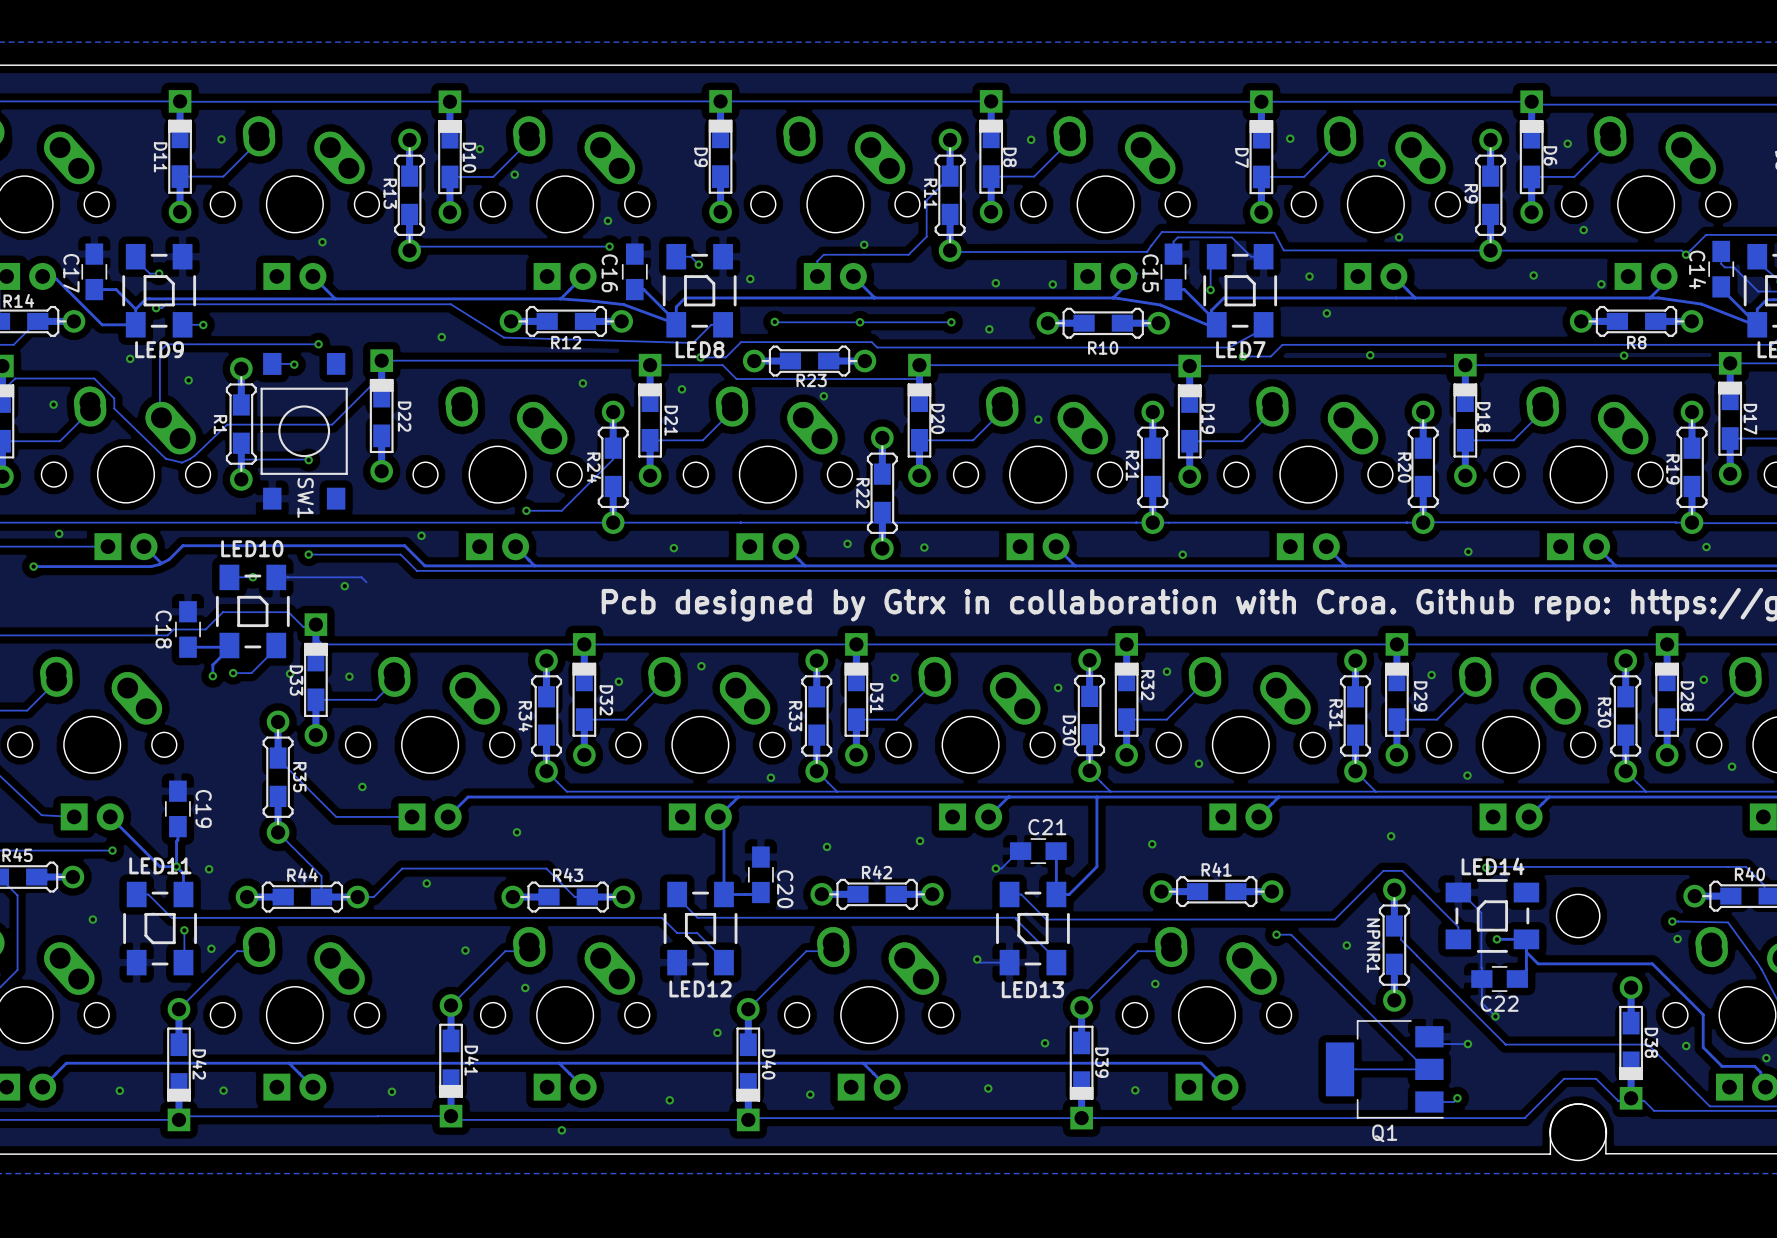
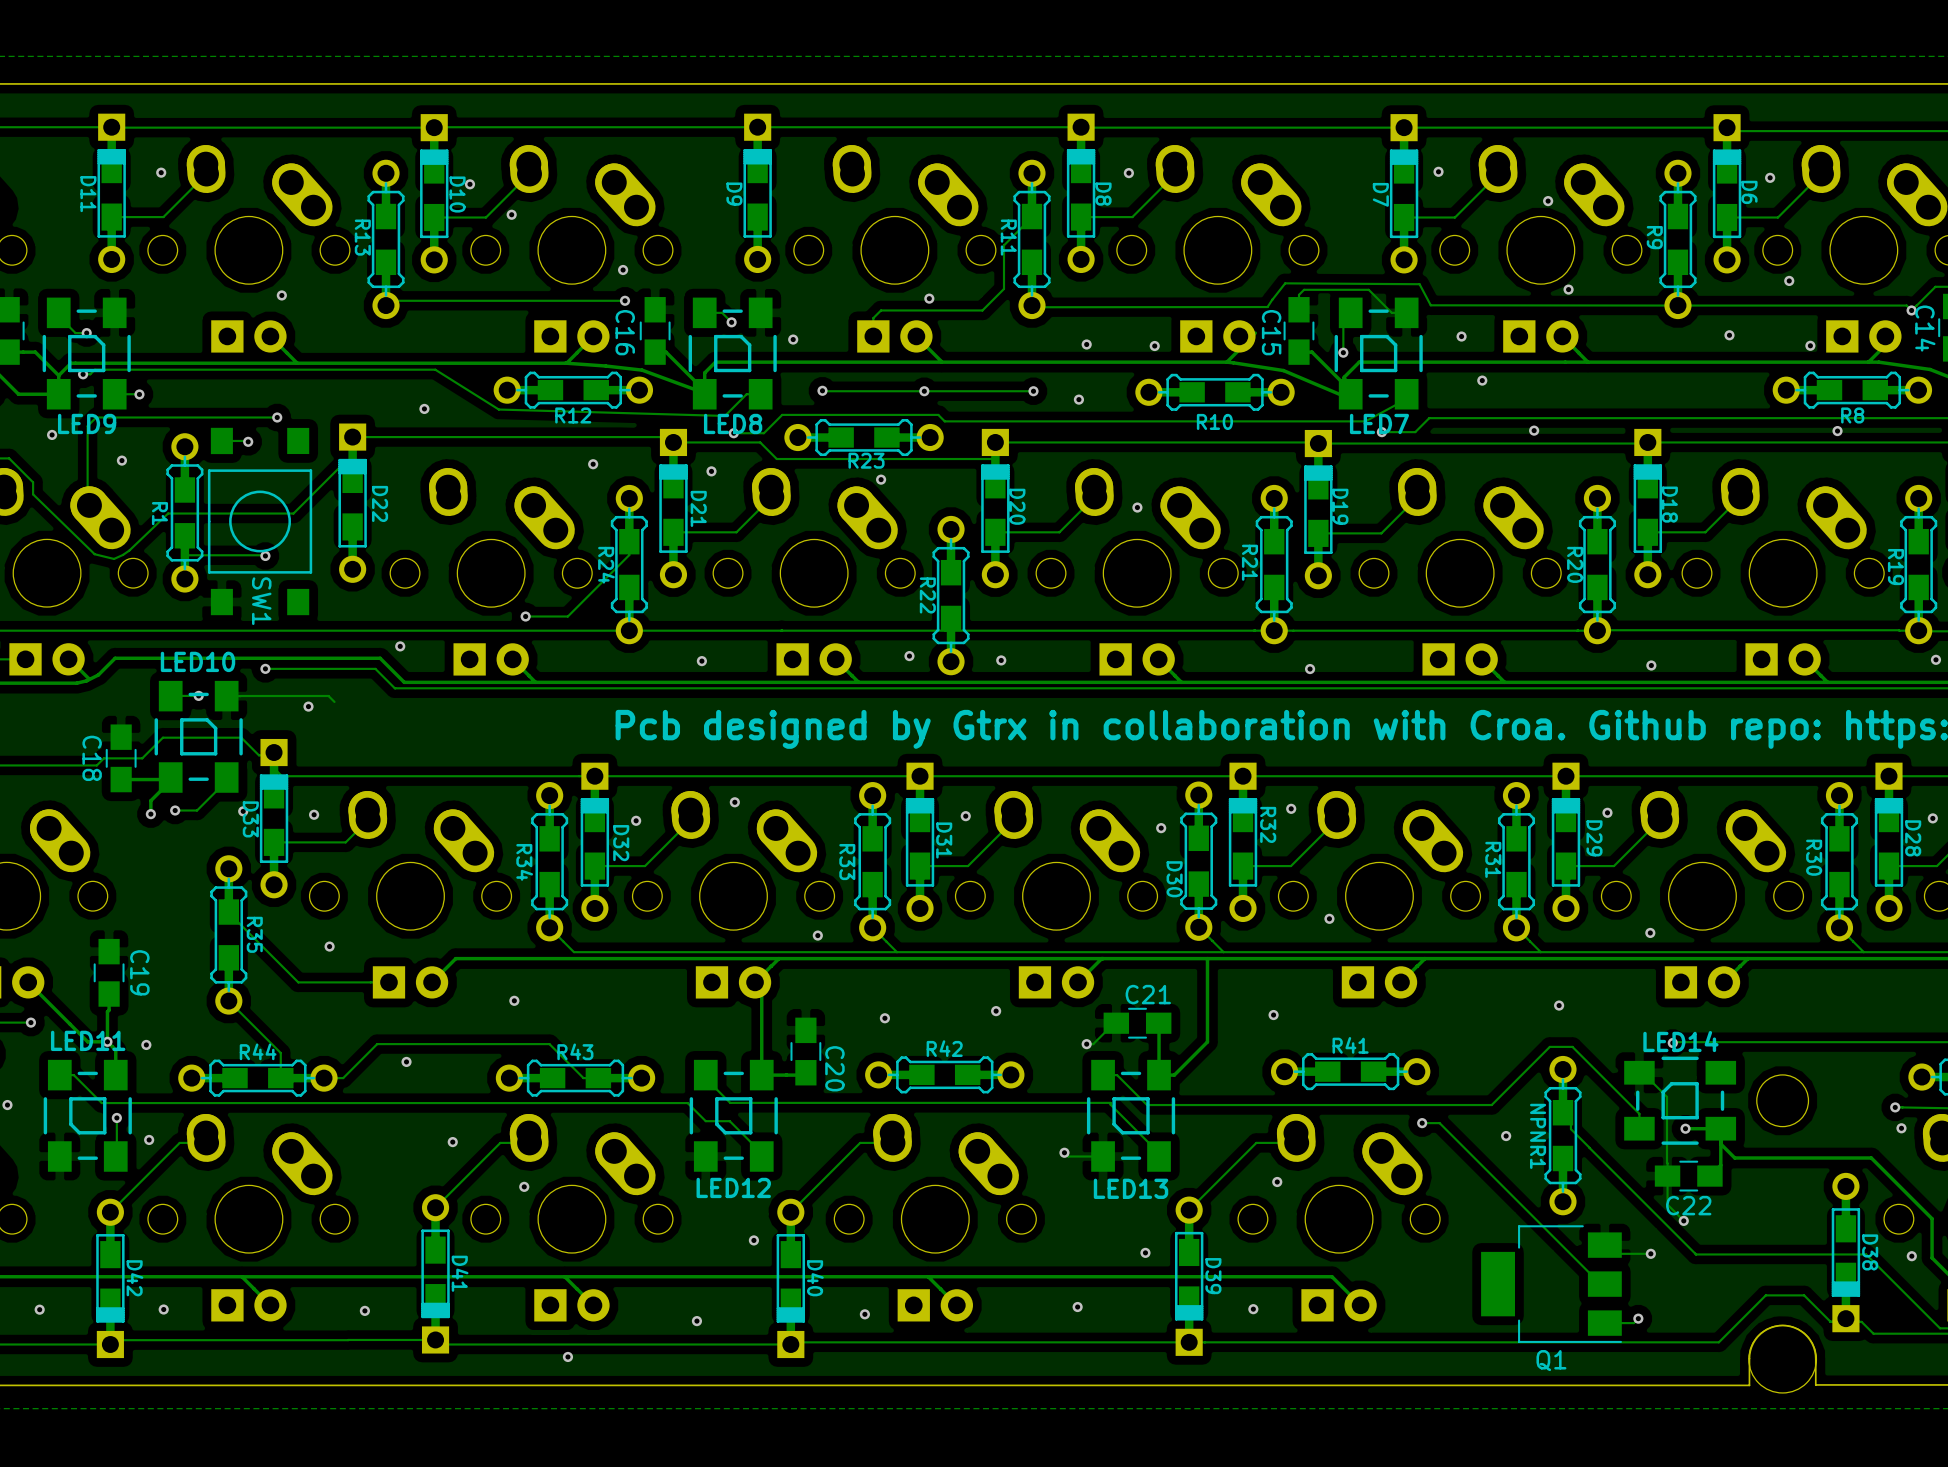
track: (1425, 1069) (1340, 1069) -> none

